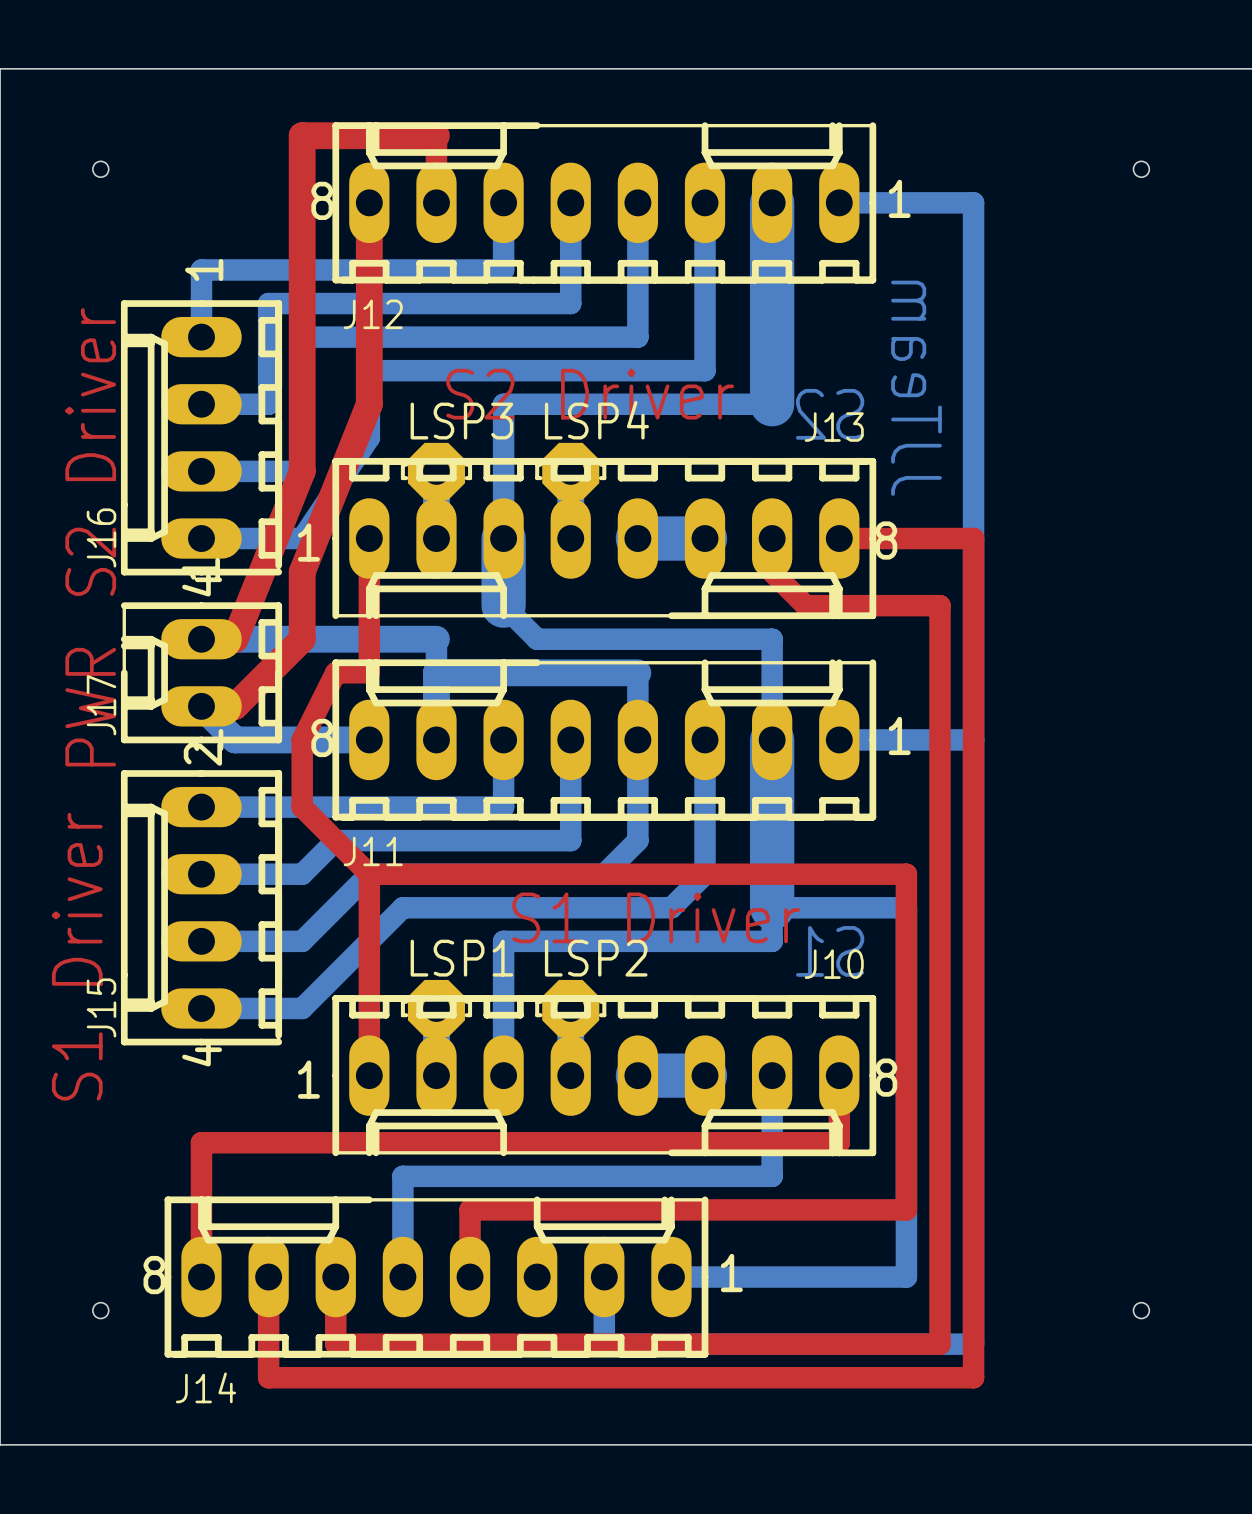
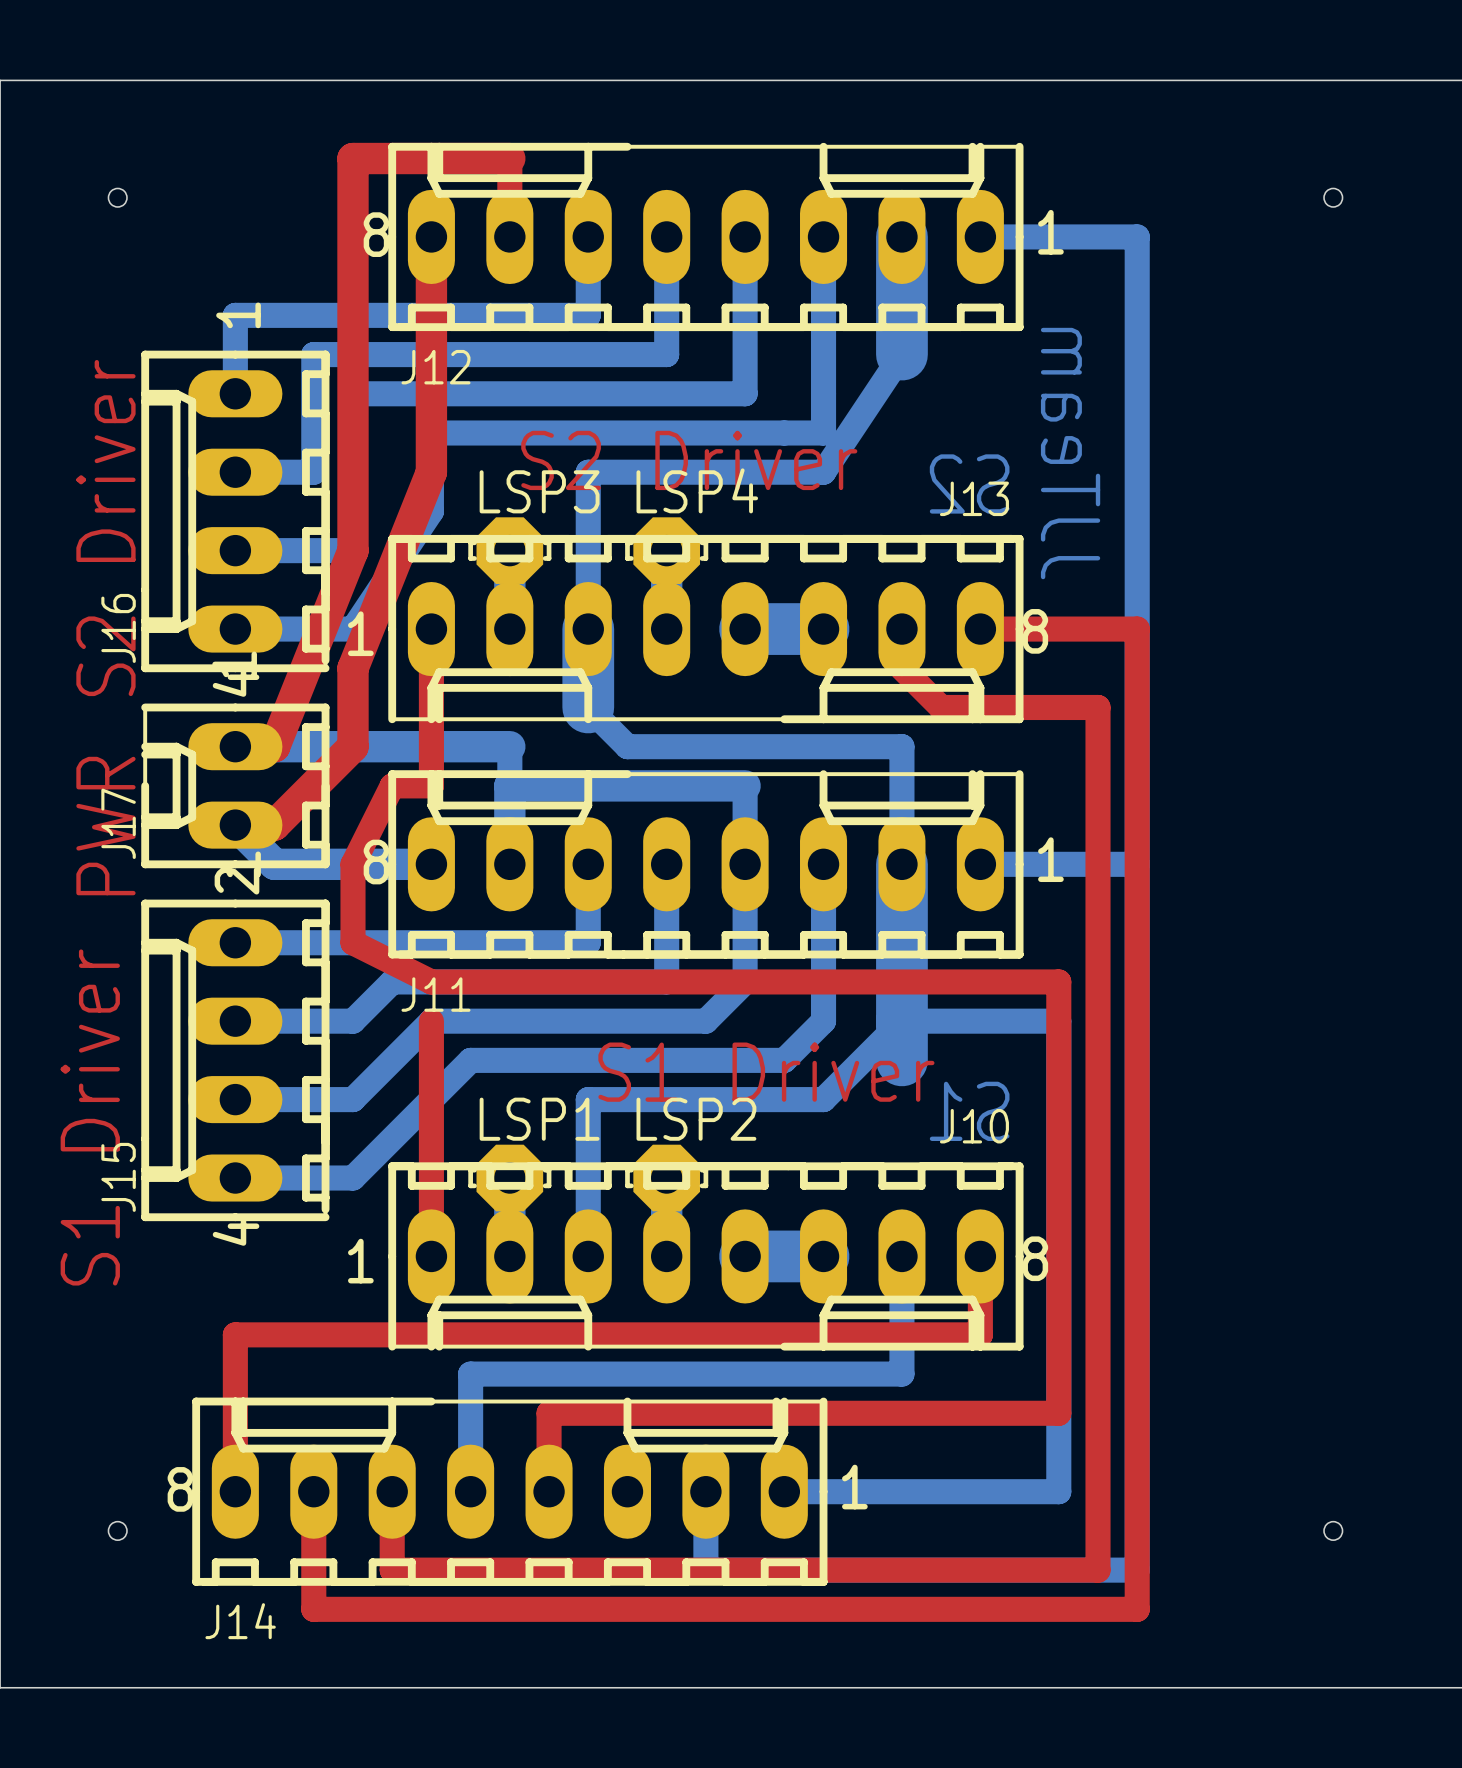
bottom track: (772, 303) (772, 404) (705, 404) -> (901, 354) (823, 472)
top track: (302, 807) (369, 874) (906, 874) -> (352, 942) (431, 981) (1058, 981) (1058, 1021)
bottom track: (906, 907) (772, 907) (772, 941) (705, 941) -> (1058, 1060) (1058, 1021) (901, 1021) (823, 1099)

